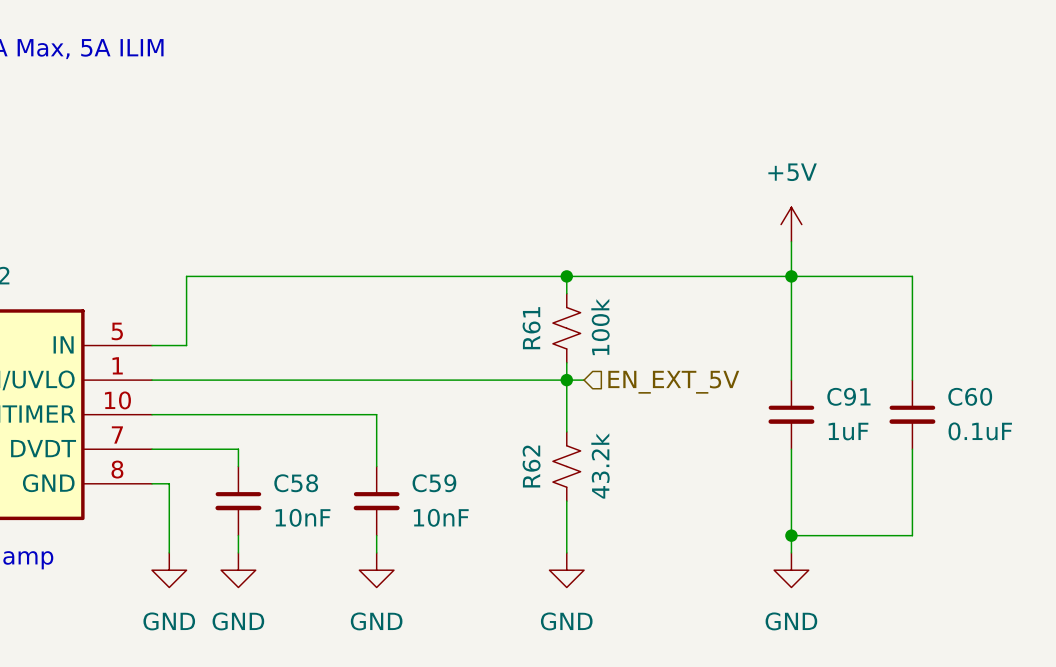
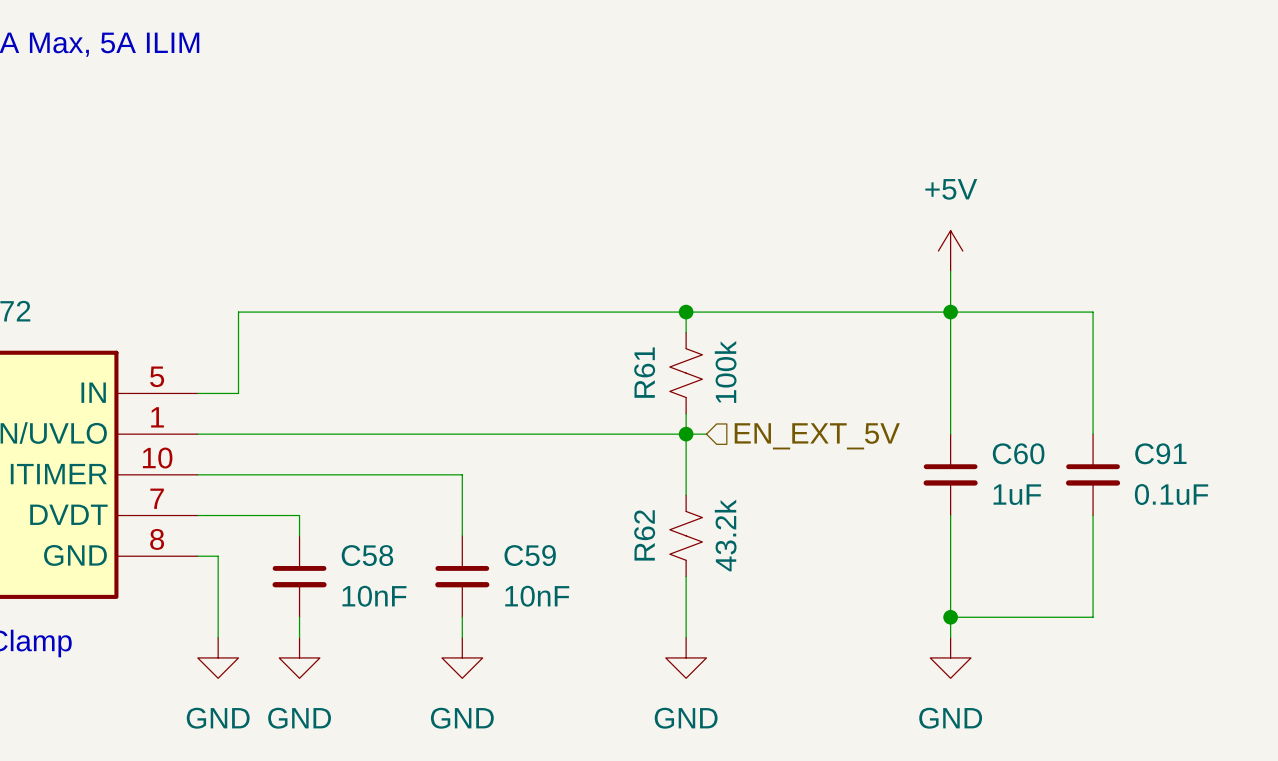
C91 name: C91 (848, 396) -> C60 (1018, 453)
C60 name: C60 (970, 396) -> C91 (1160, 453)

